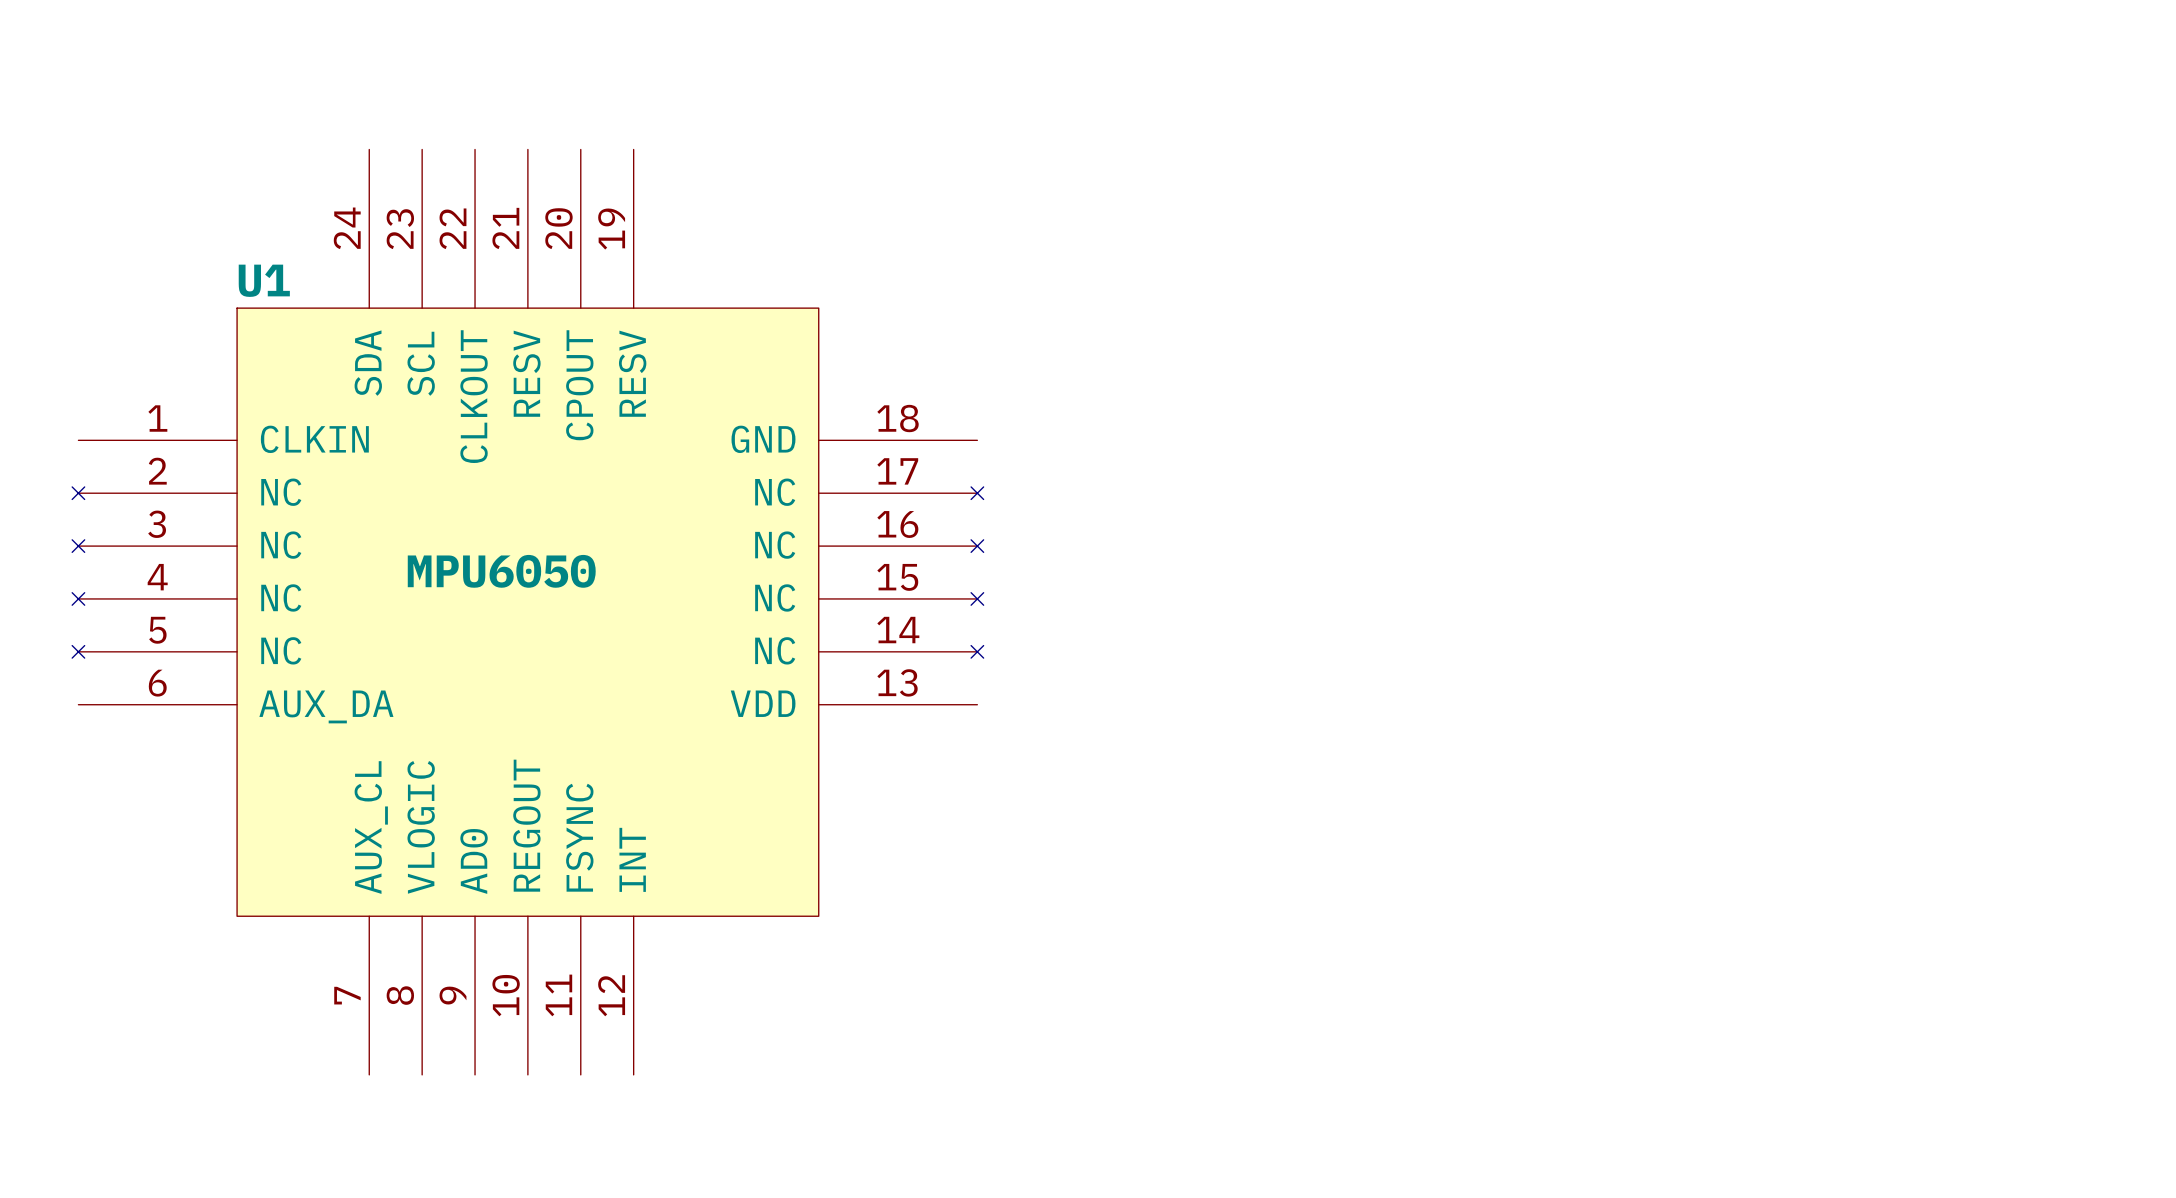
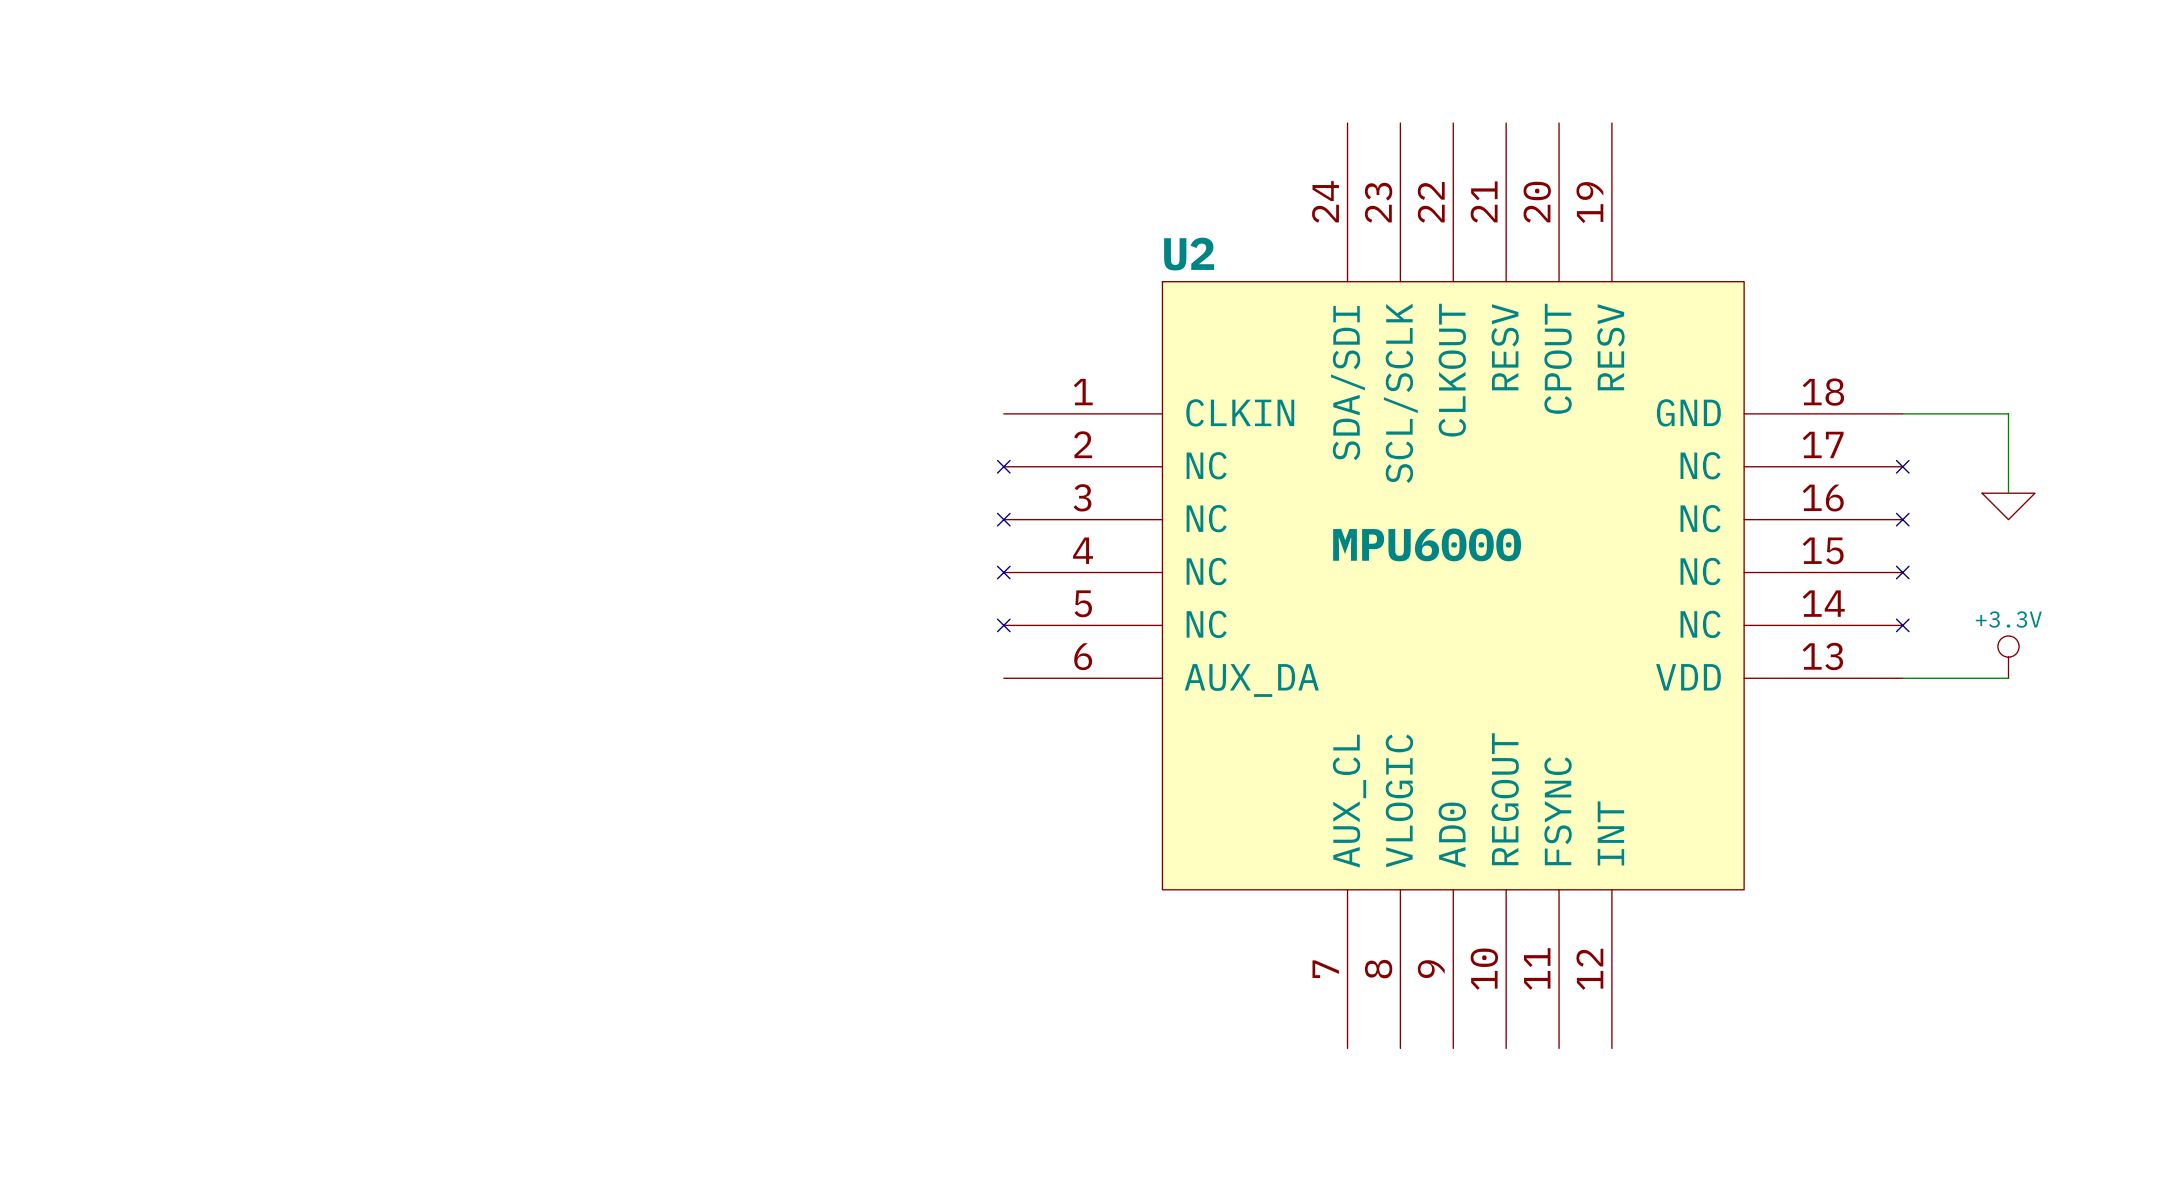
wire: none -> (1902, 413) (2008, 413) (2008, 493)
power symbol: none -> (2008, 506)
U2: none -> MPU6000 (1453, 585)
U1: MPU6050 (527, 612) -> none
power symbol: none -> +3.3V (2008, 657)
wire: none -> (1902, 678) (2008, 678)

